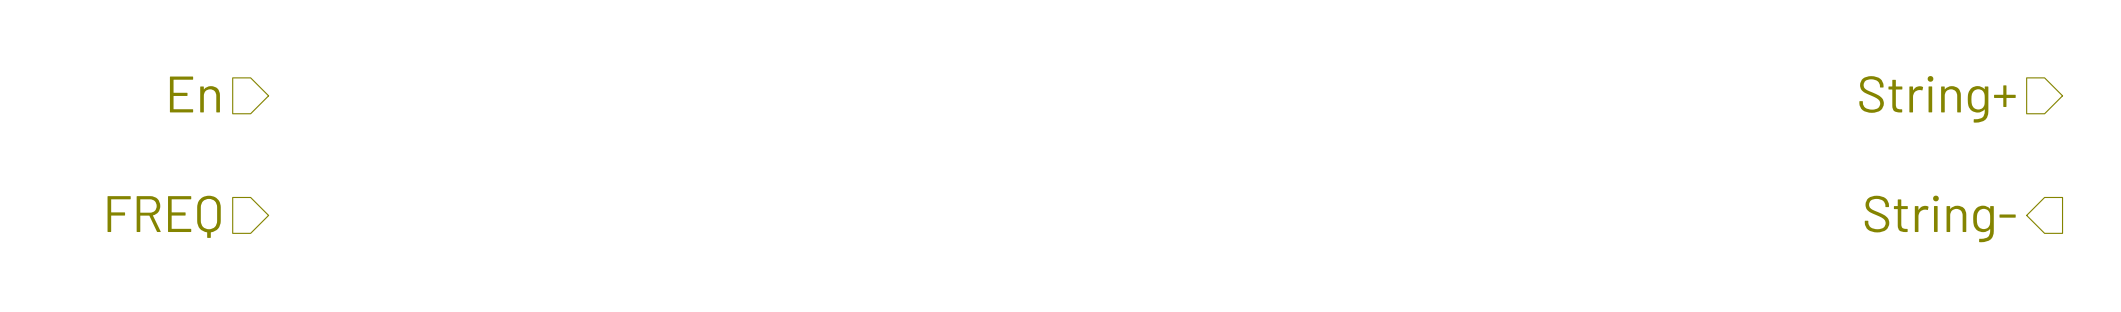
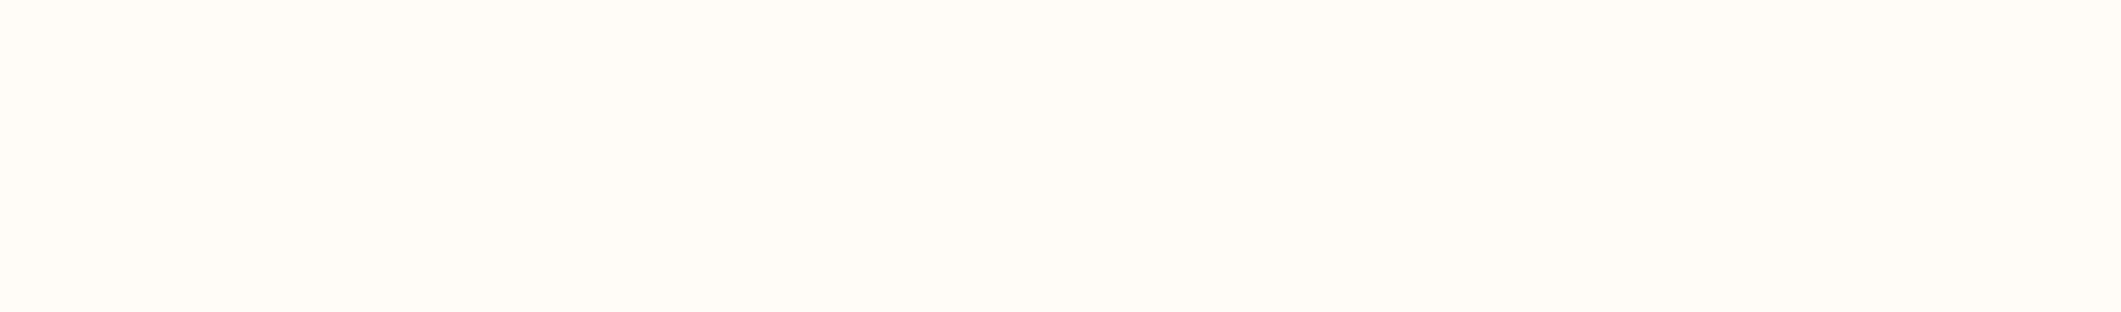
hierarchical label: En (194, 94) -> none
hierarchical label: String+ (1937, 99) -> none
hierarchical label: FREQ (164, 216) -> none
hierarchical label: String- (1940, 218) -> none

